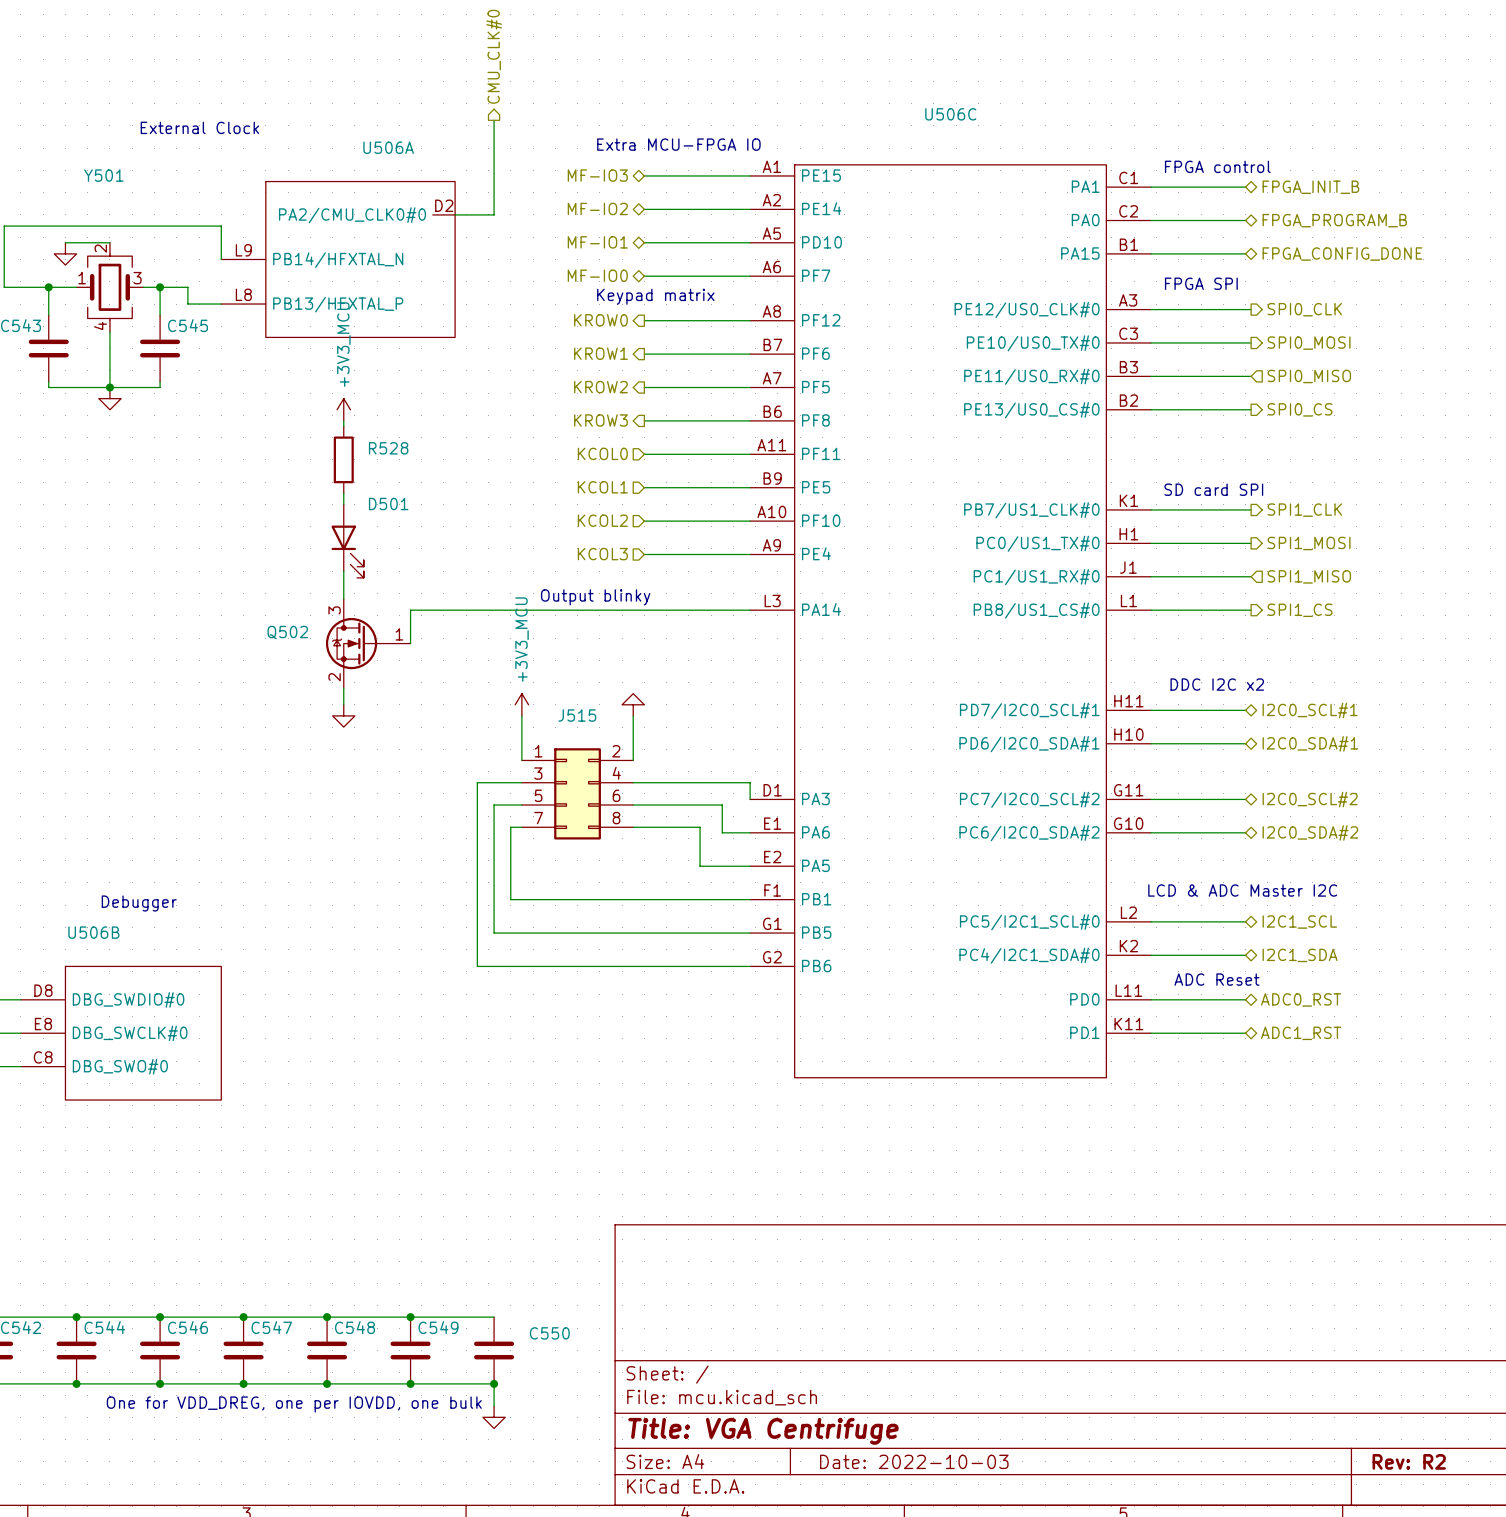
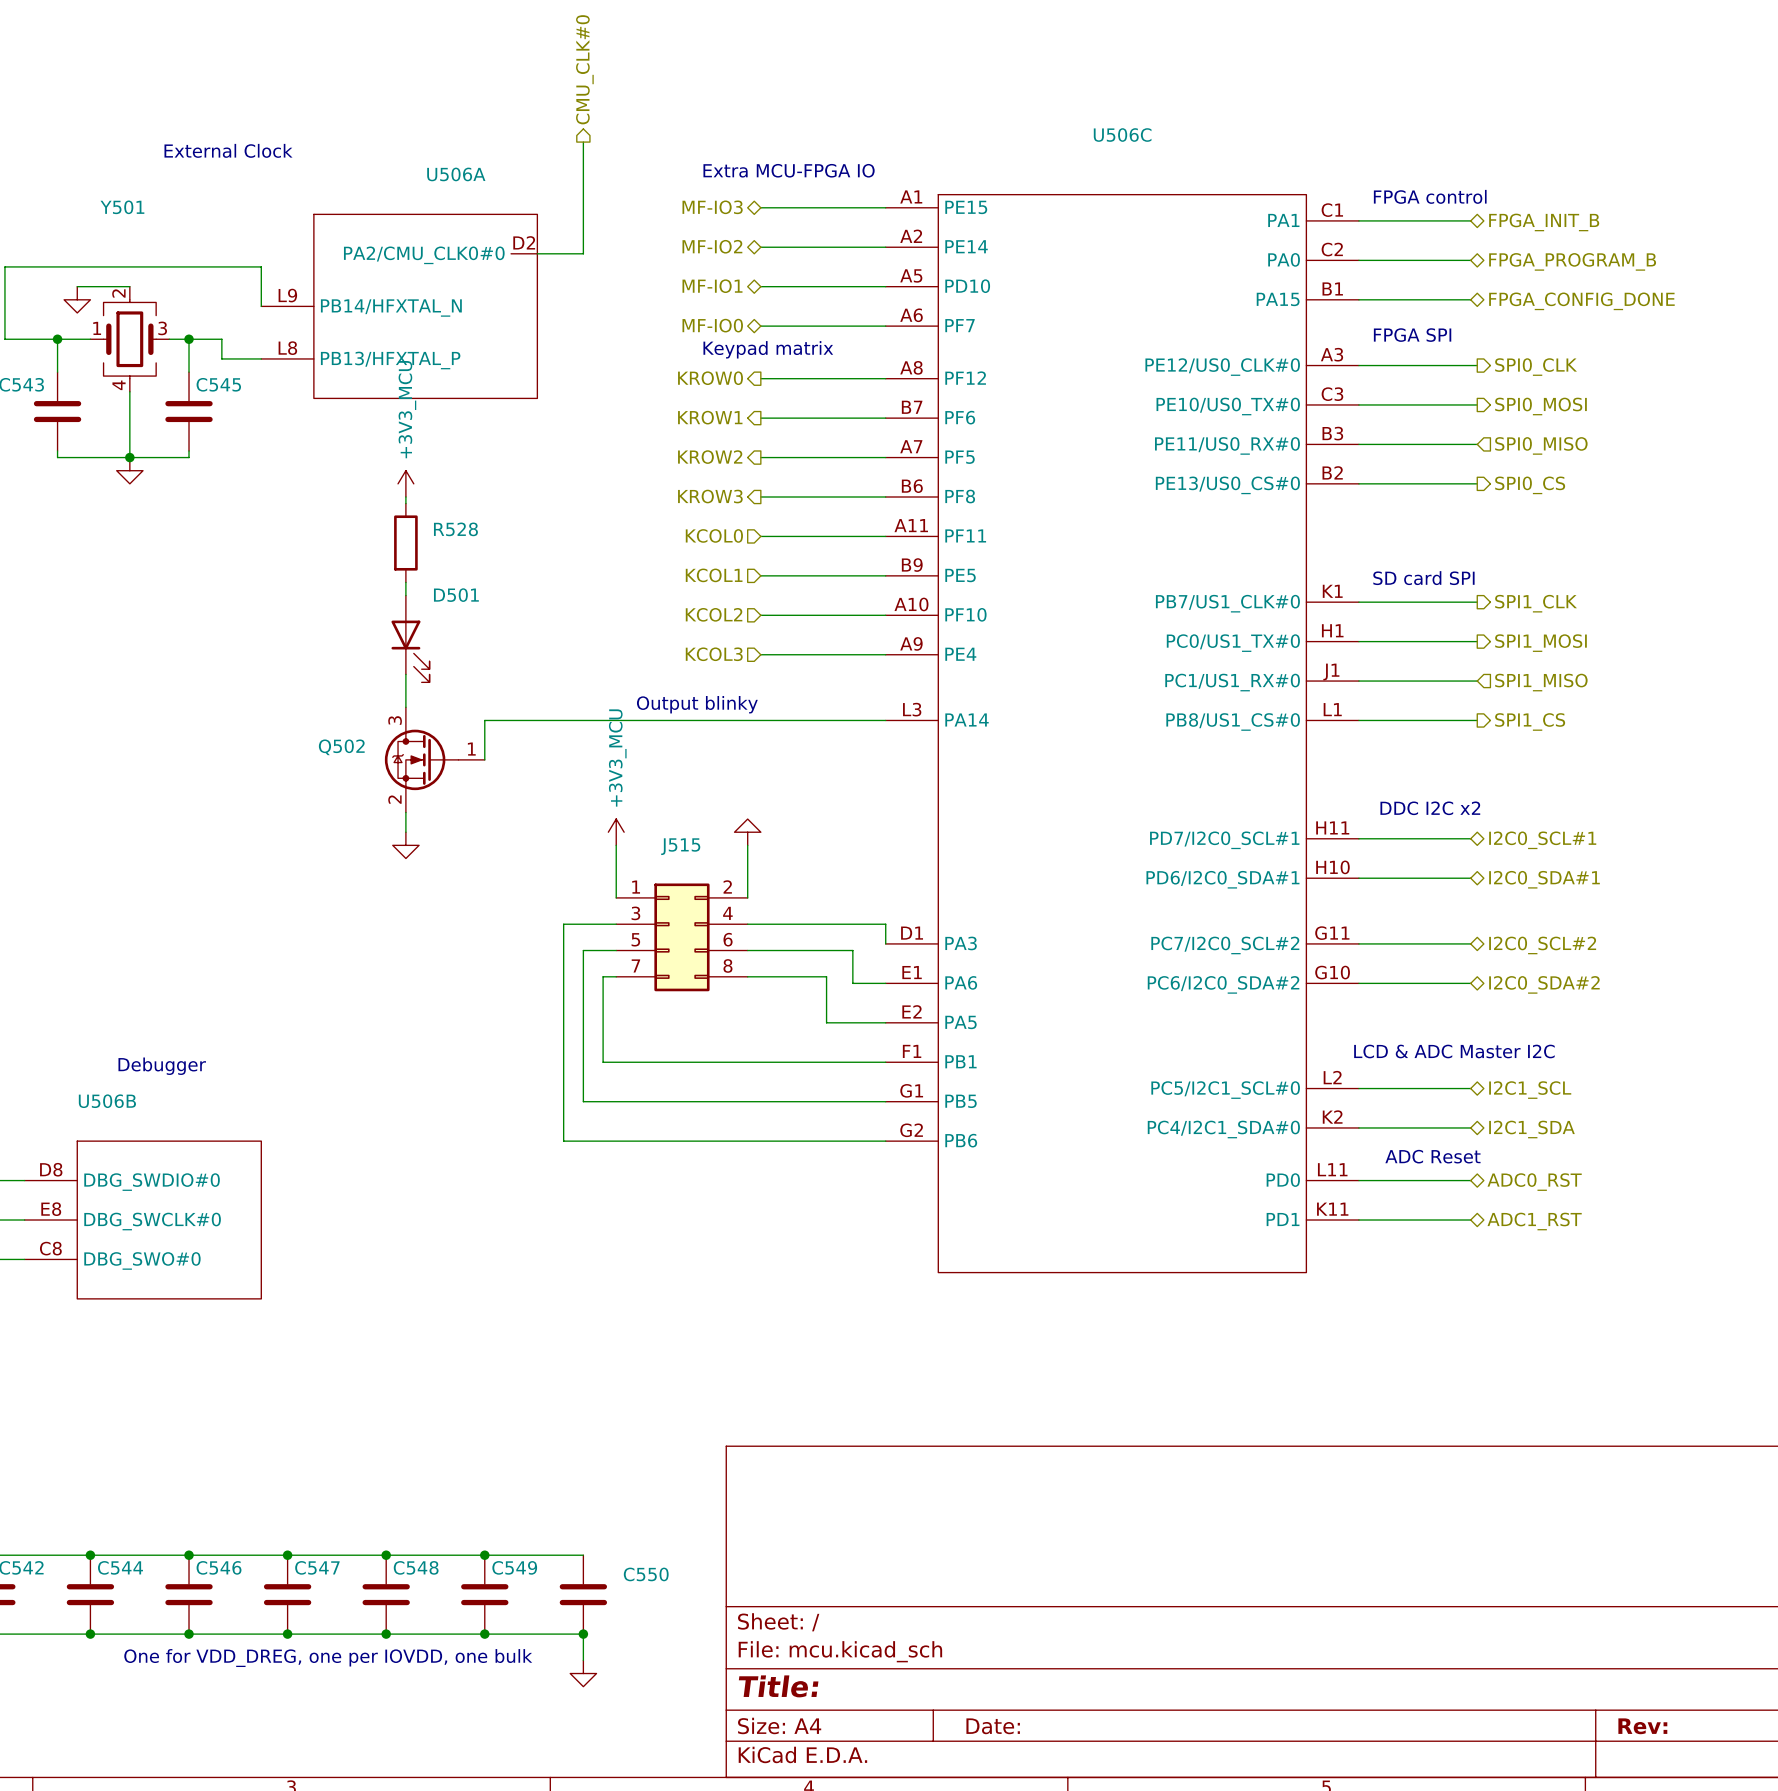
title block: Title: VGA Centrifuge (763, 1431) -> Title: (778, 1686)
title block: Date: 2022-10-03 (914, 1461) -> Date: (993, 1726)
title block: Rev: R2 (1409, 1461) -> Rev: (1642, 1726)

